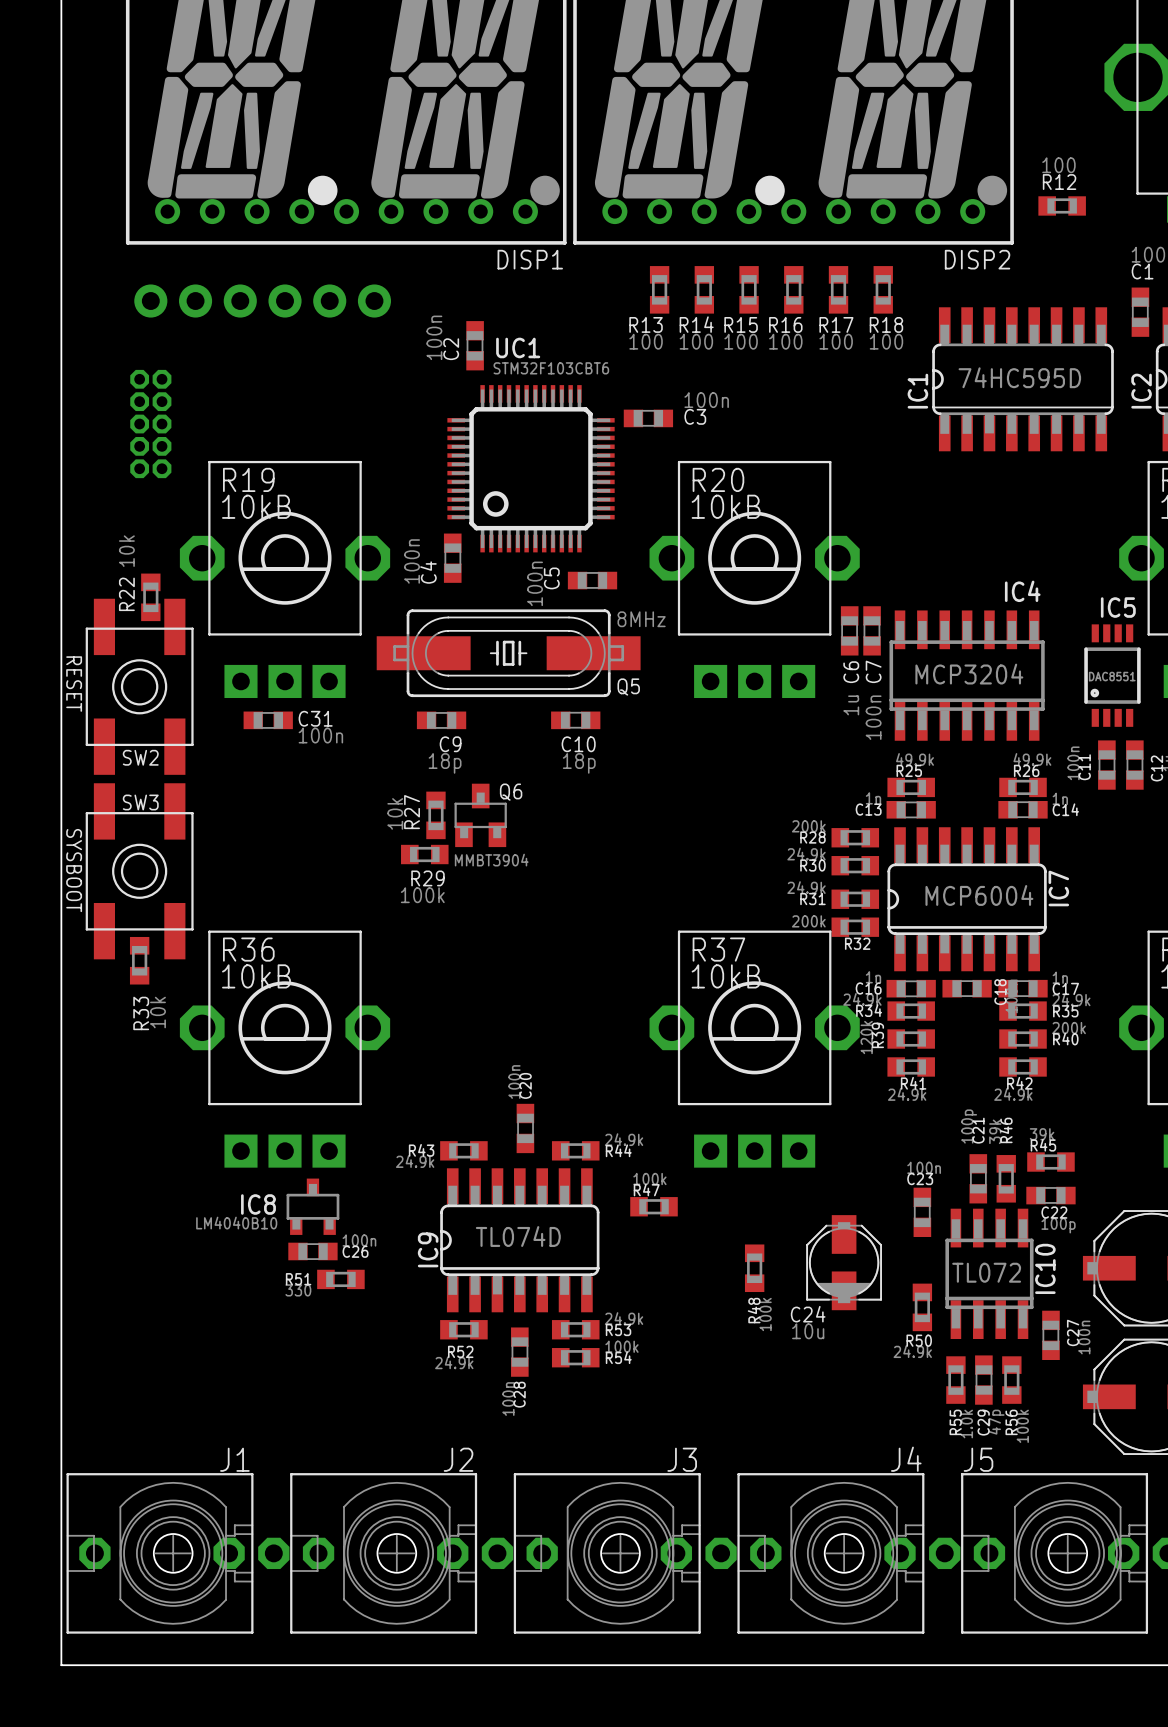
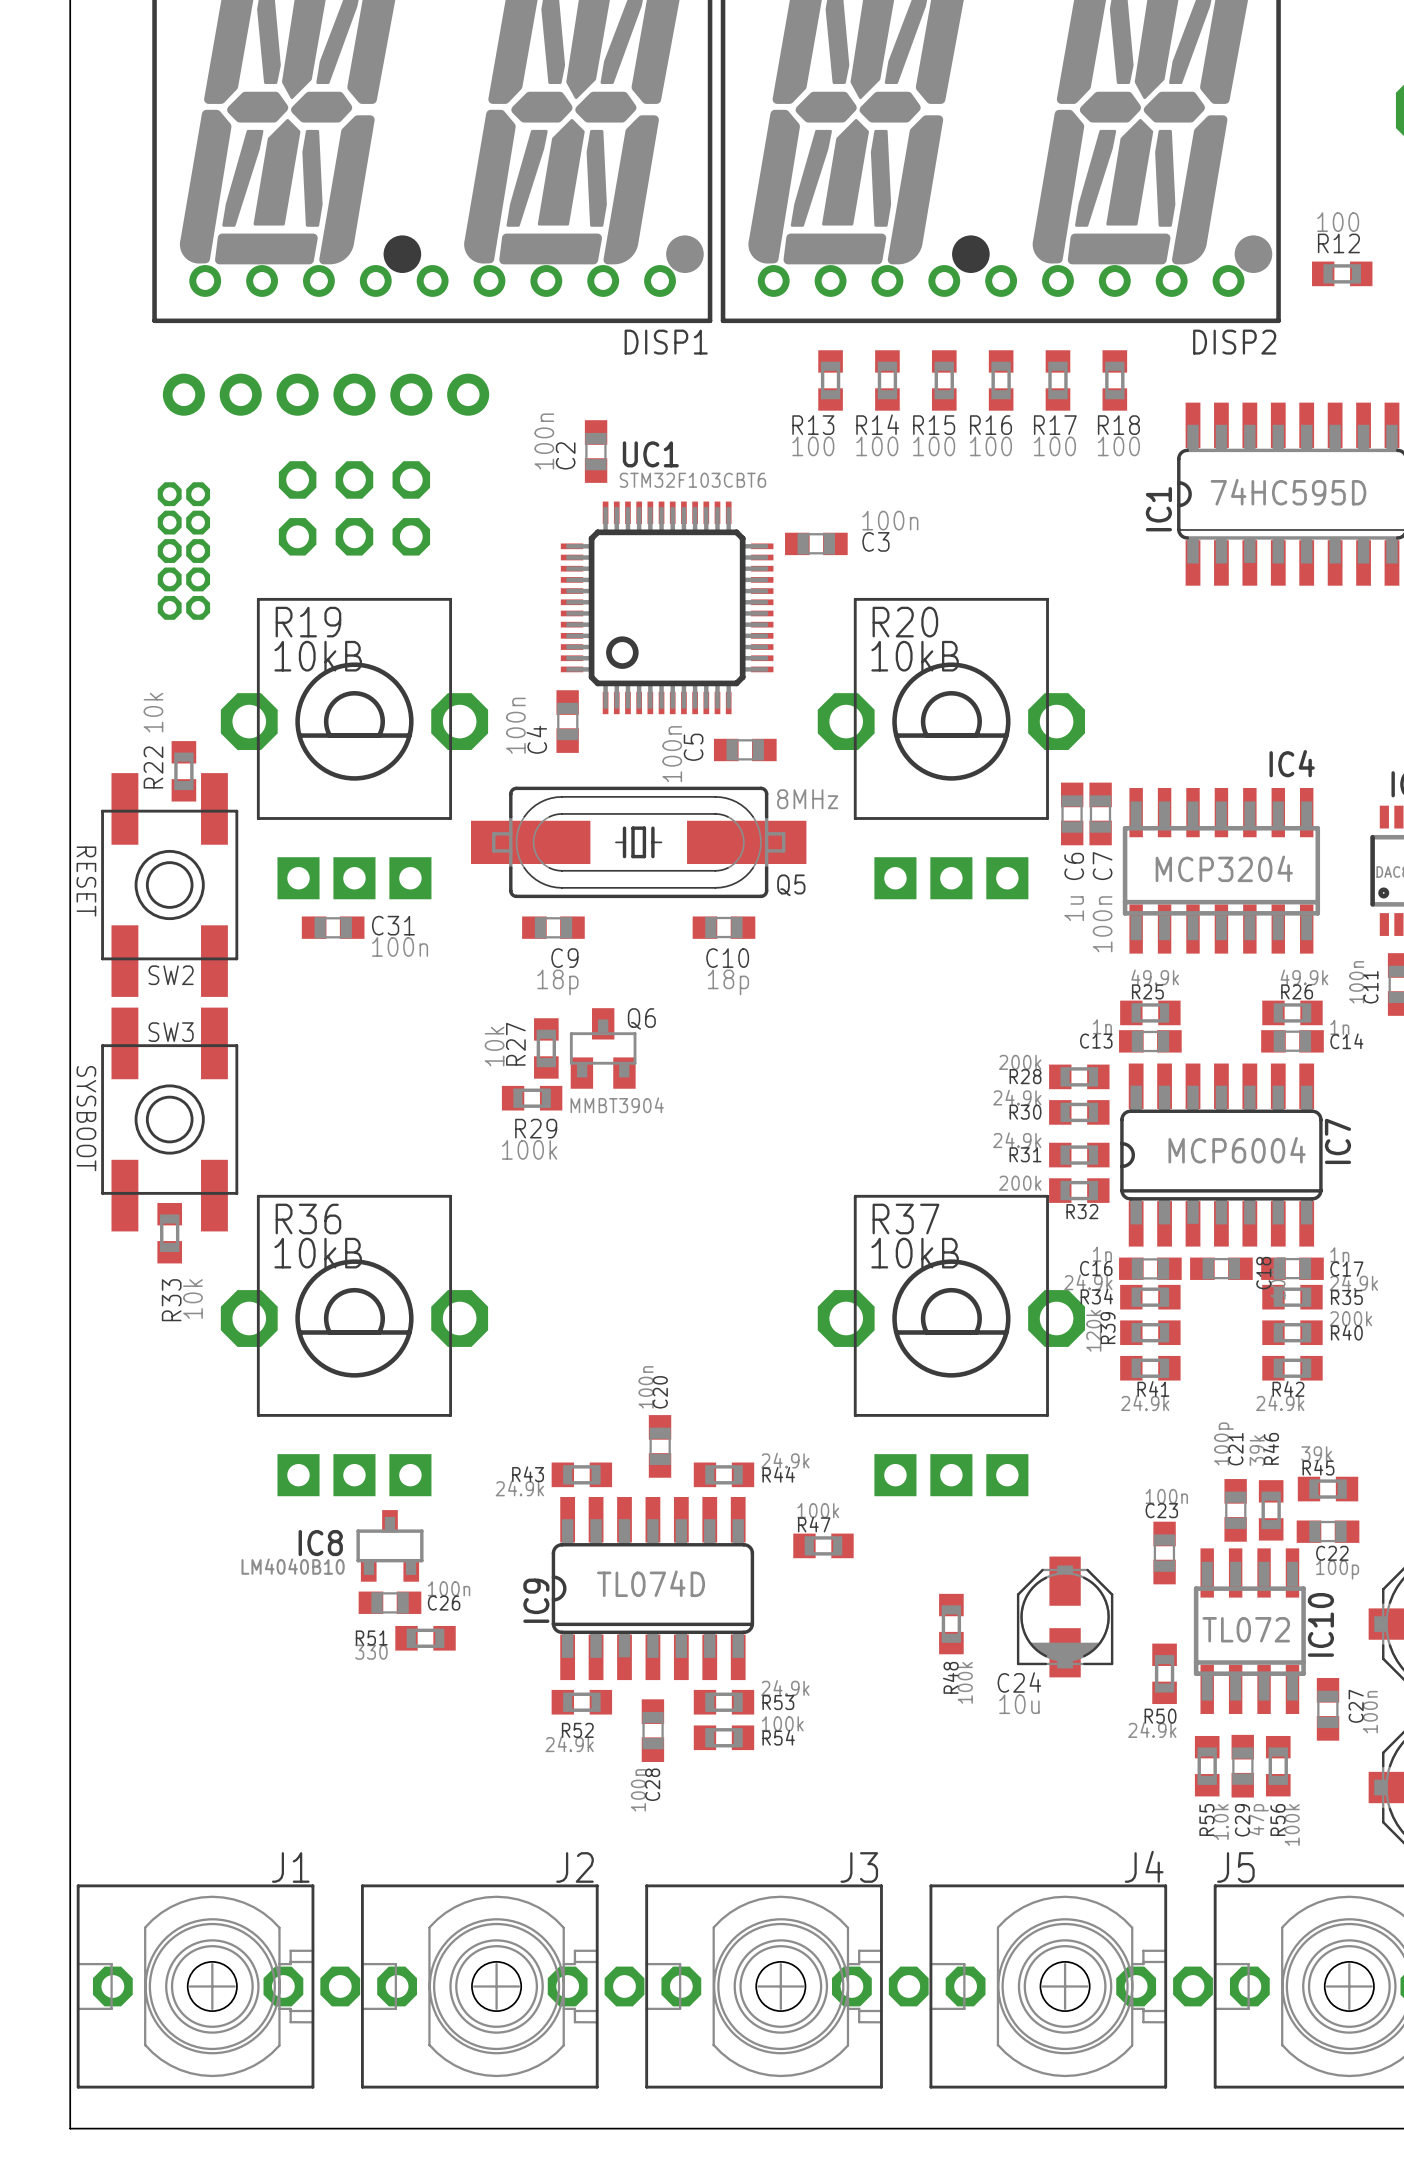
part: none -> (354, 508)

